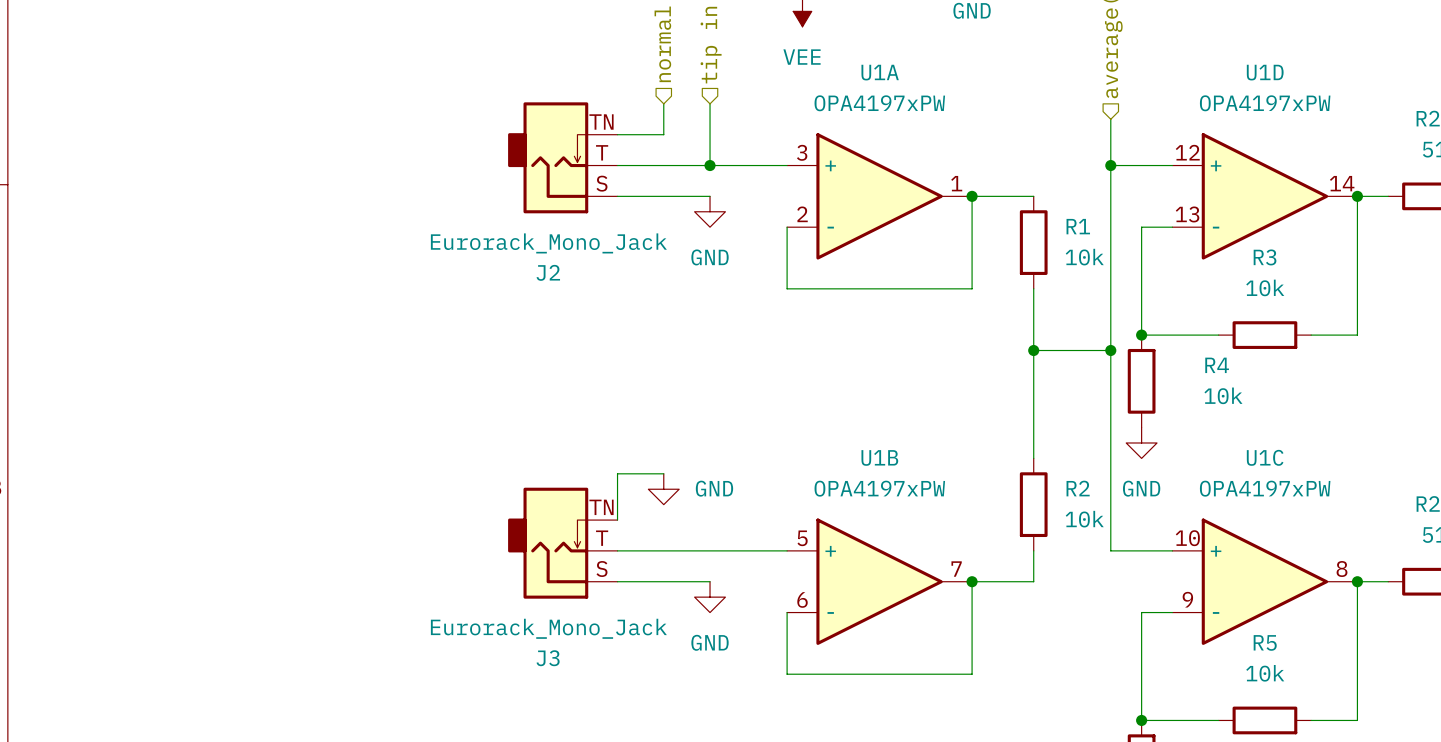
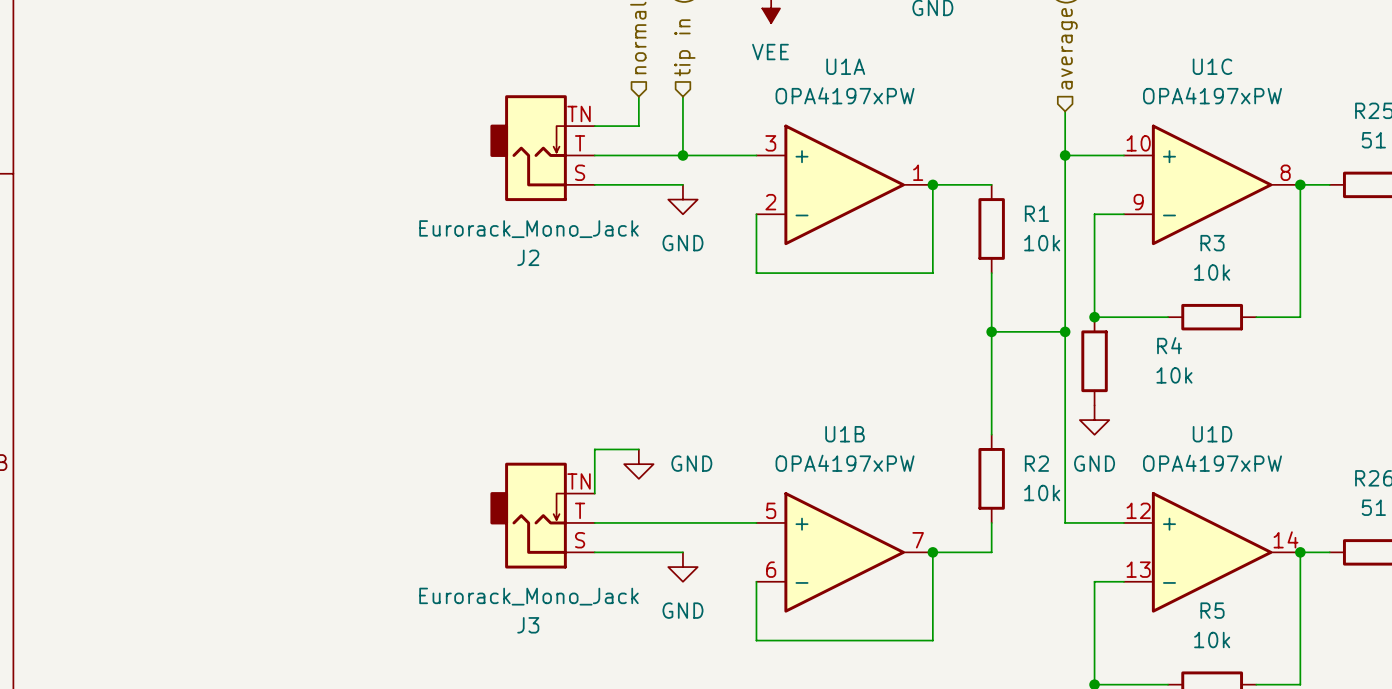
U1D position: (1264, 196) -> (1212, 552)
U1C position: (1264, 581) -> (1212, 184)

